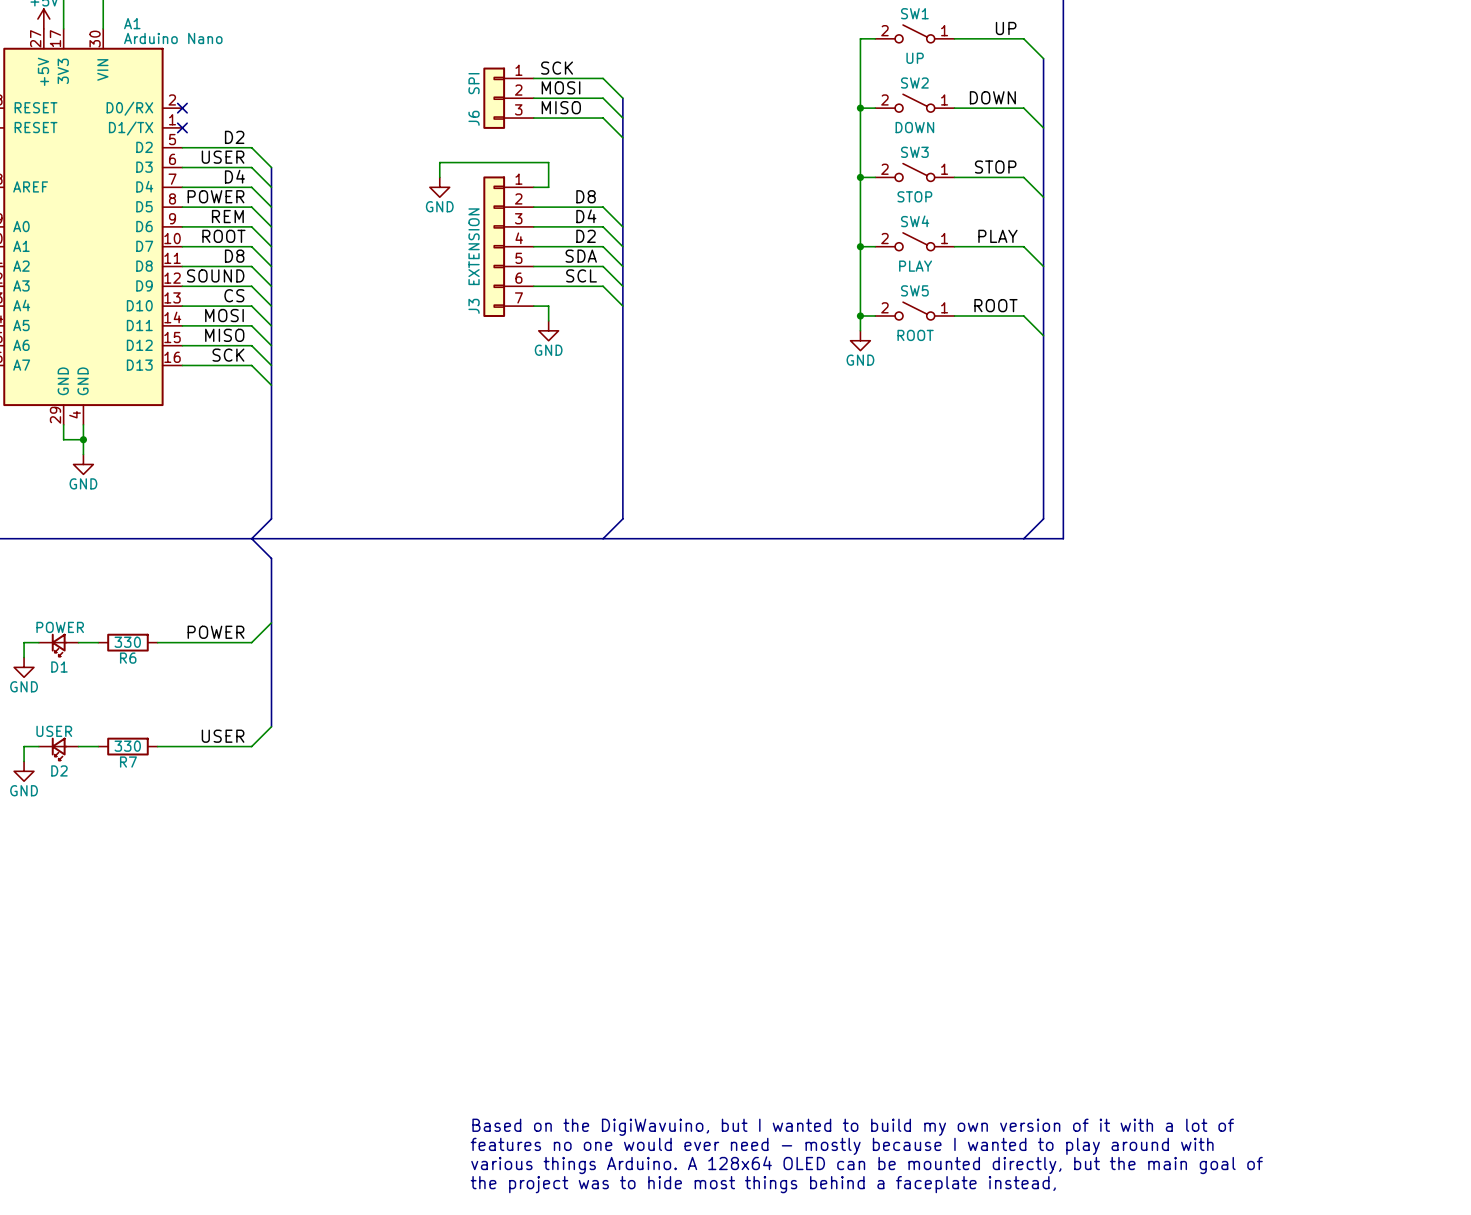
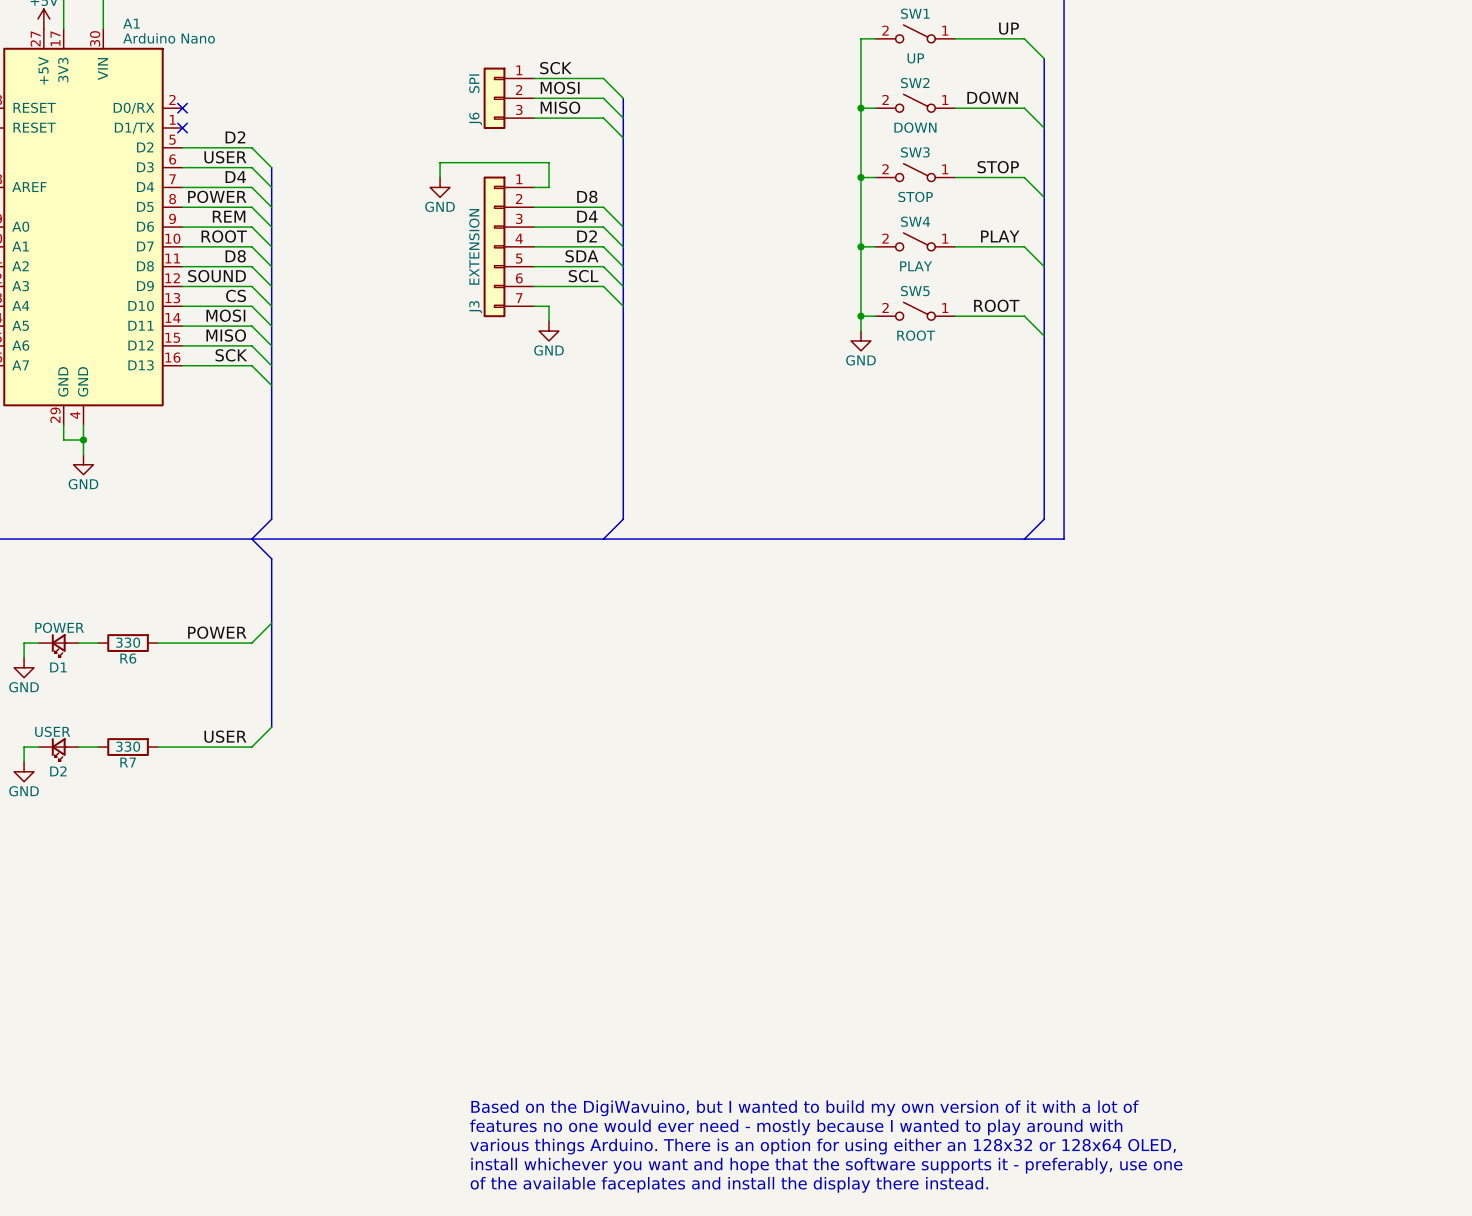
text: none -> Based on the DigiWavuino, but I wanted to build my own version of it with a lot of (805, 1108)
text: Based on the DigiWavuino, but I wanted to build my own version of it with a lot of (853, 1127) -> features no one would ever need - mostly because I wanted to play around with (796, 1127)
text: features no one would ever need - mostly because I wanted to play around with (842, 1146) -> various things Arduino. There is an option for using either an 128x32 or 128x64 OLED, (822, 1146)
text: various things Arduino. A 128x64 OLED can be mounted directly, but the main goal of (867, 1165) -> install whichever you want and hope that the software supports it - preferably, use one (826, 1165)
text: the project was to hide most things behind a faceplate instead, (763, 1184) -> of the available faceplates and install the display there instead. (729, 1184)

